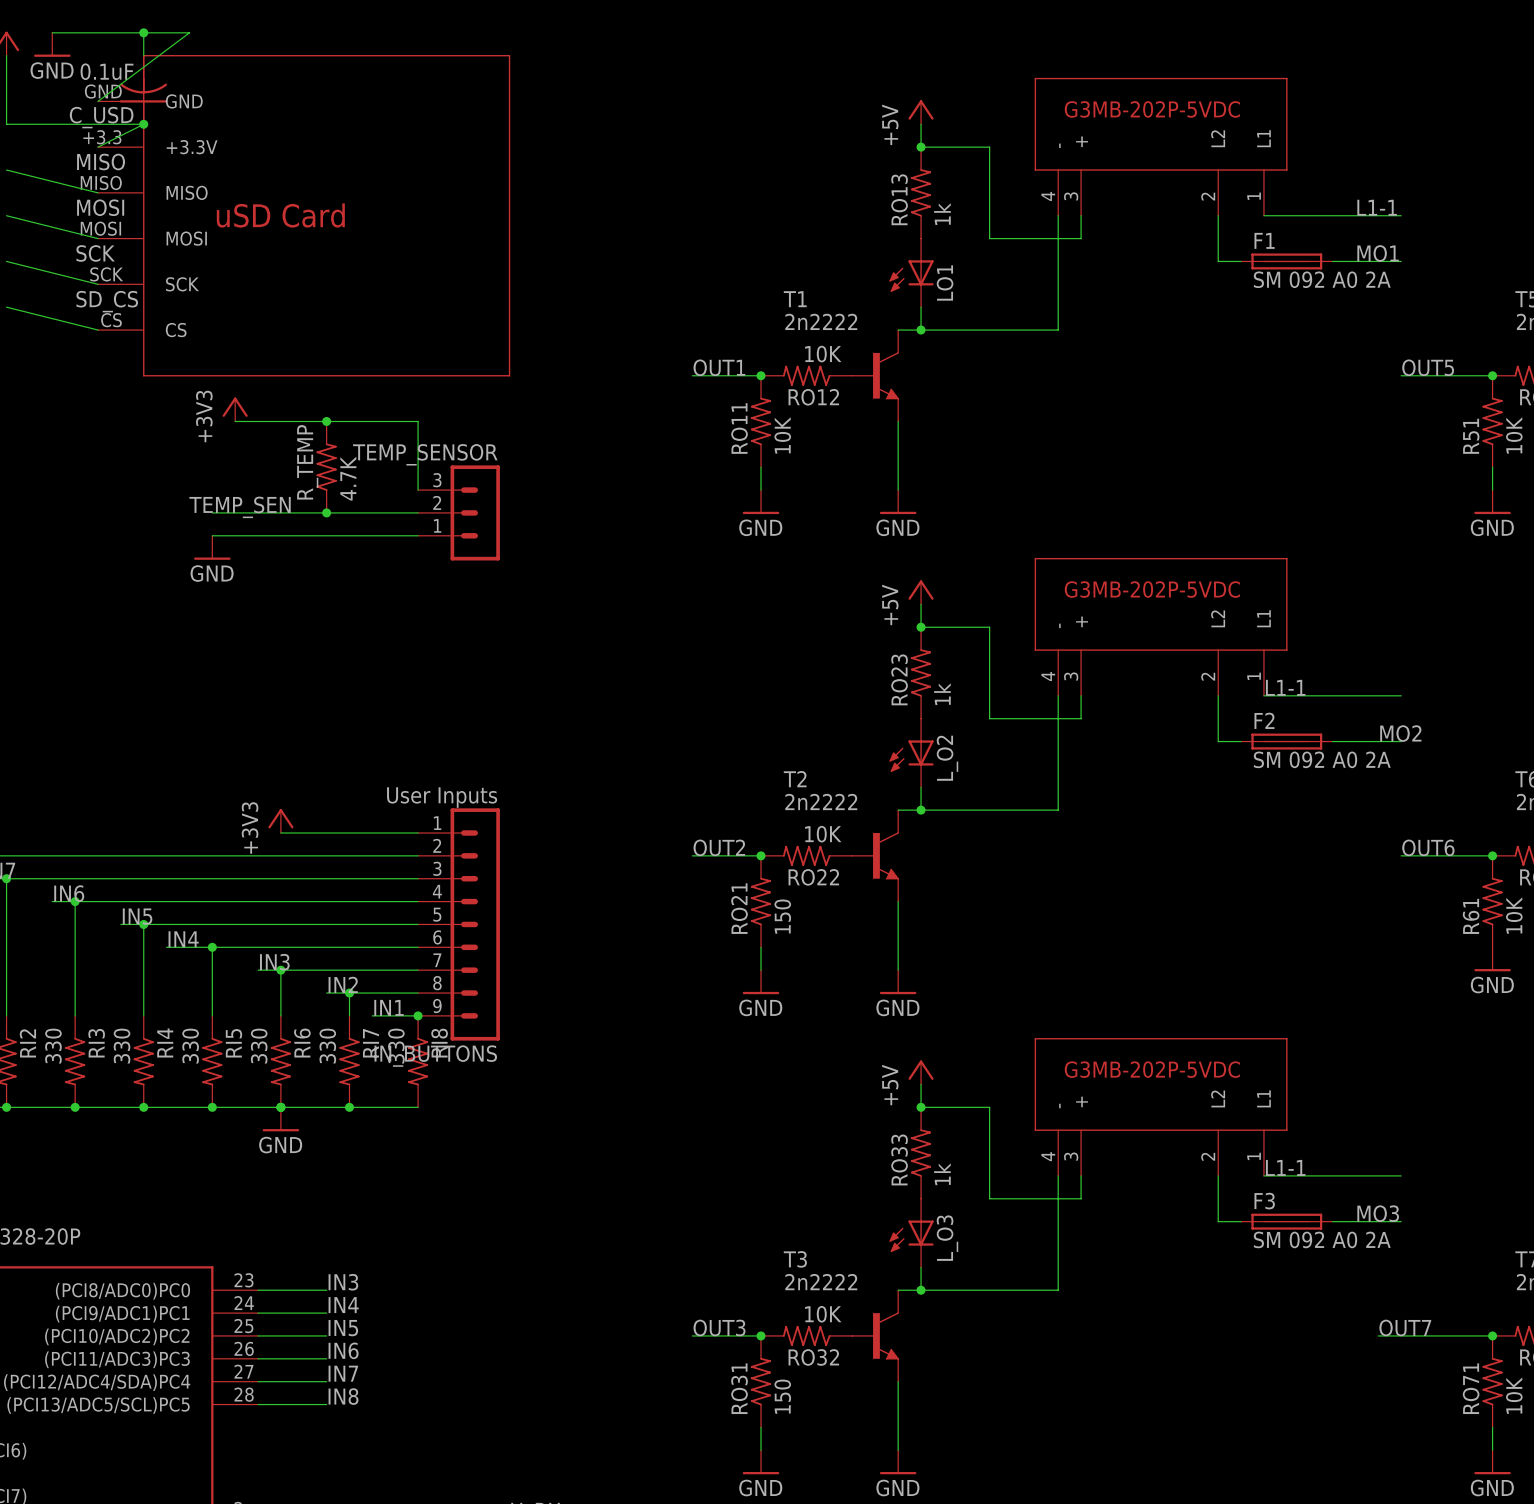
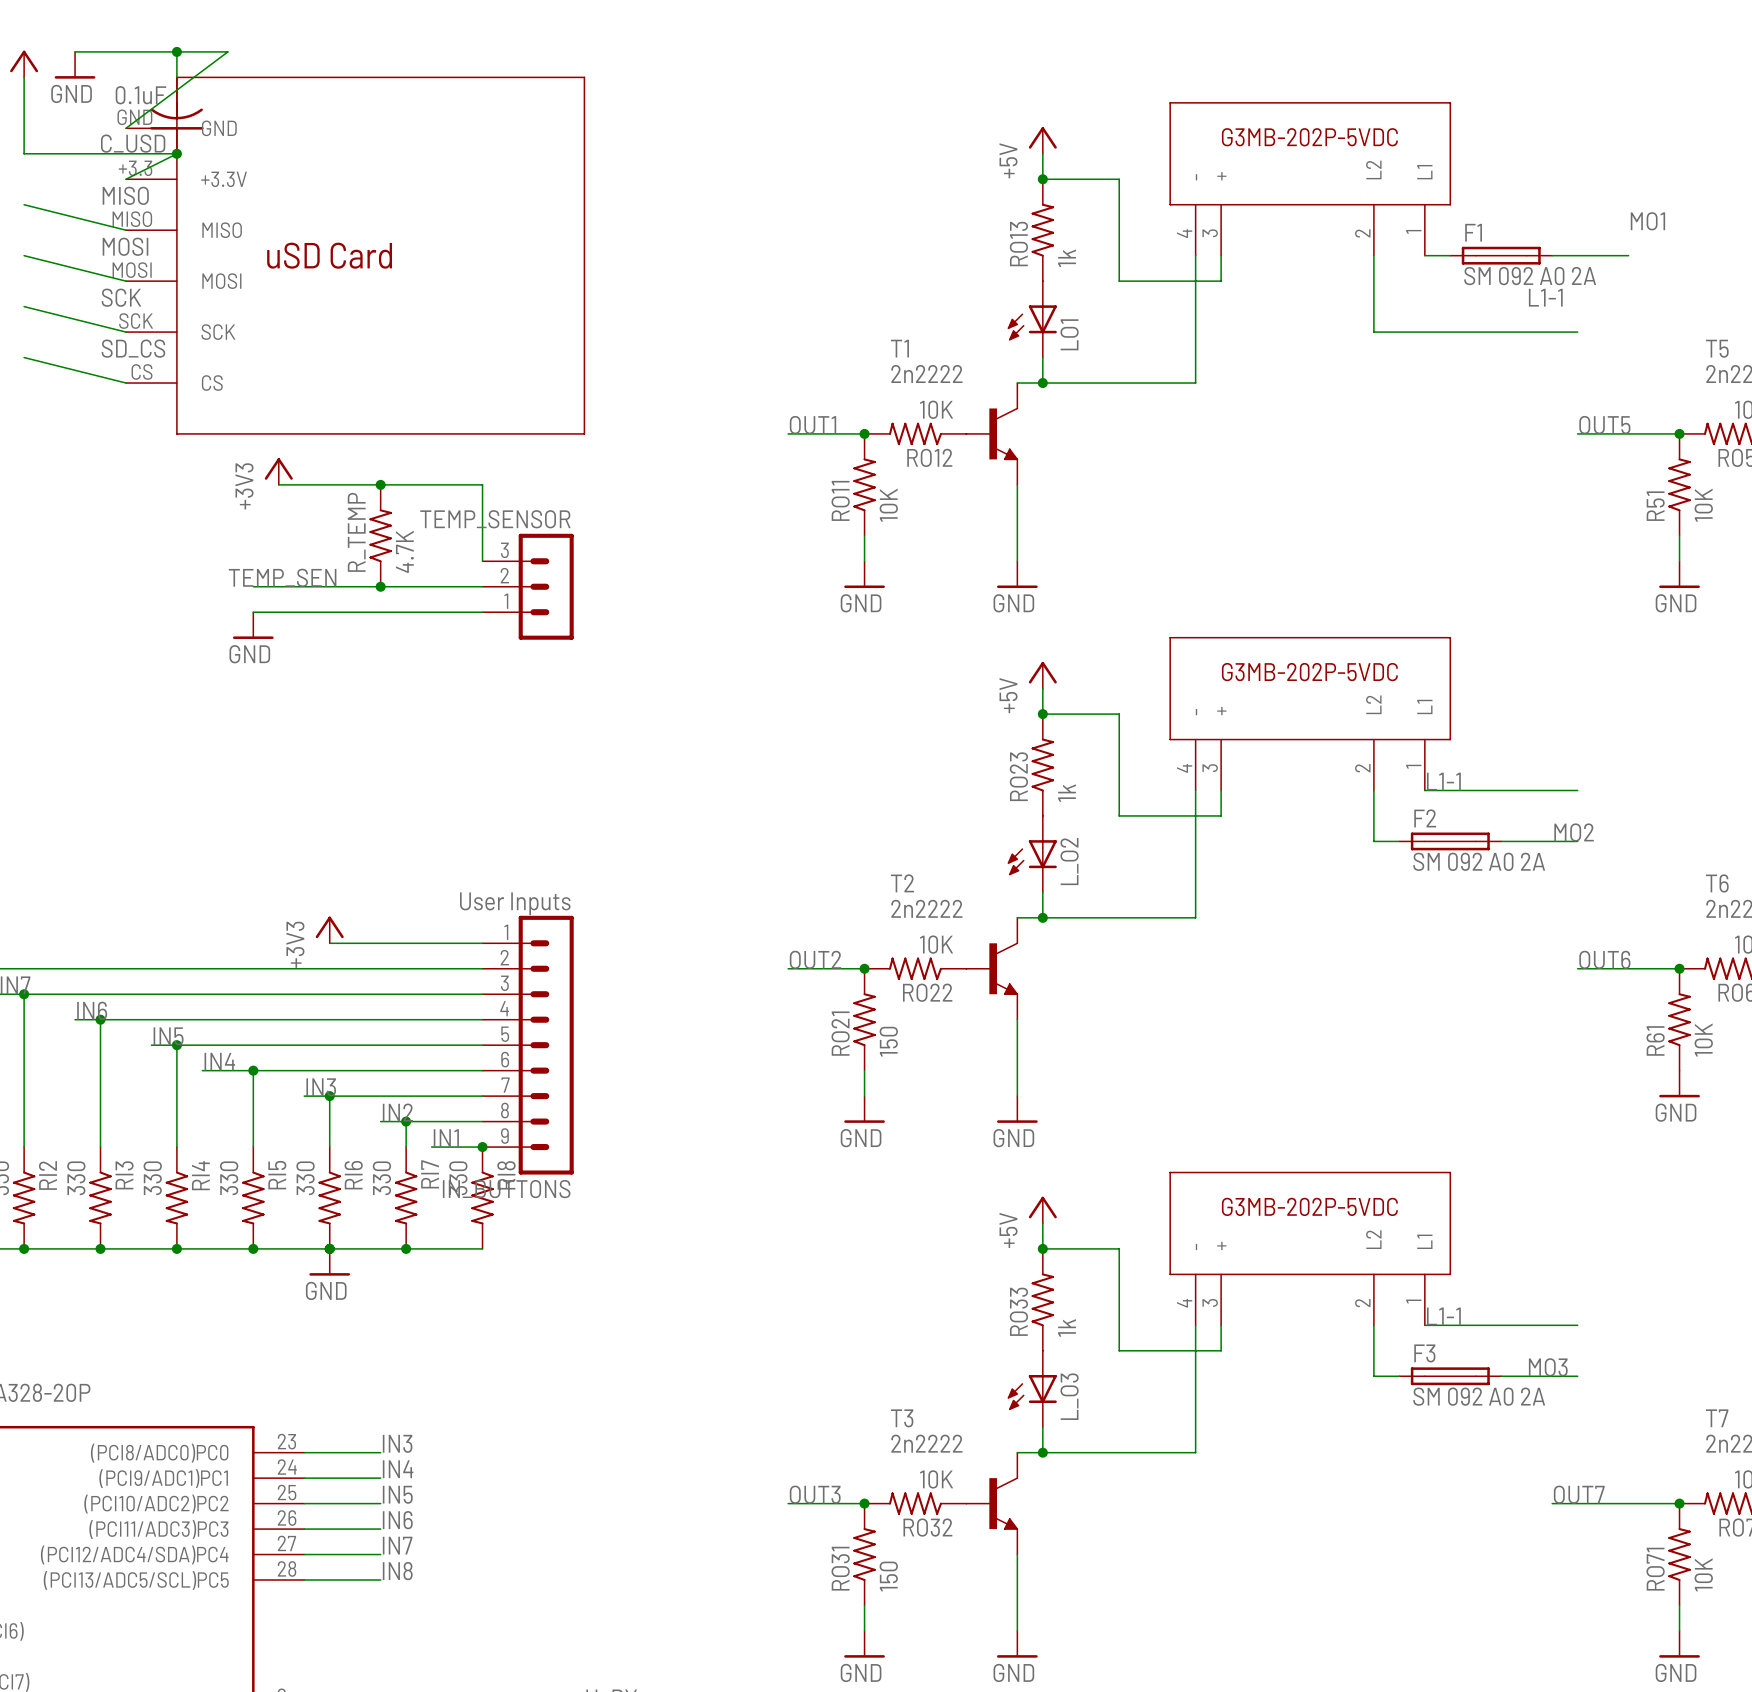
label: none -> MO1 (1647, 221)
label: L1-1 (1377, 207) -> none
wire: none -> (1577, 255) (1628, 255)
label: MO1 (1378, 253) -> L1-1 (1545, 297)
wire: (1218, 261) (1241, 261) -> (1373, 306) (1373, 332) (1577, 332)
F1 position: (1286, 261) -> (1501, 255)
wire: (1332, 261) (1401, 261) -> none

